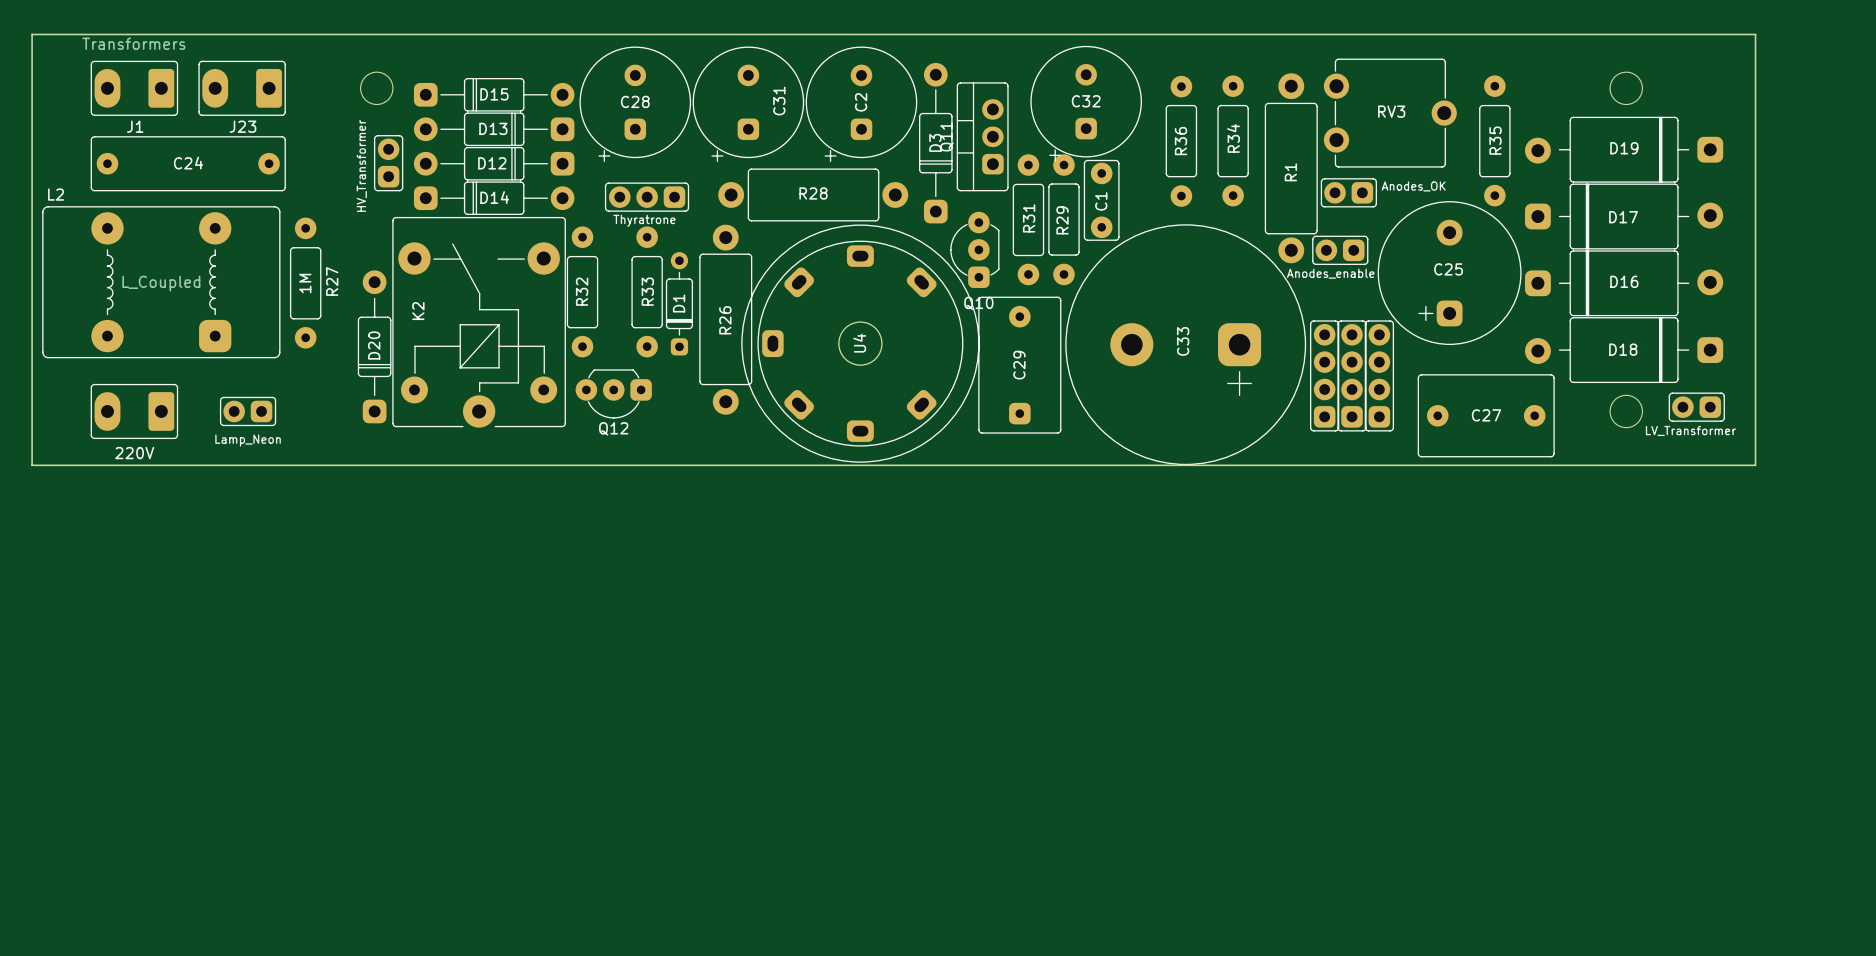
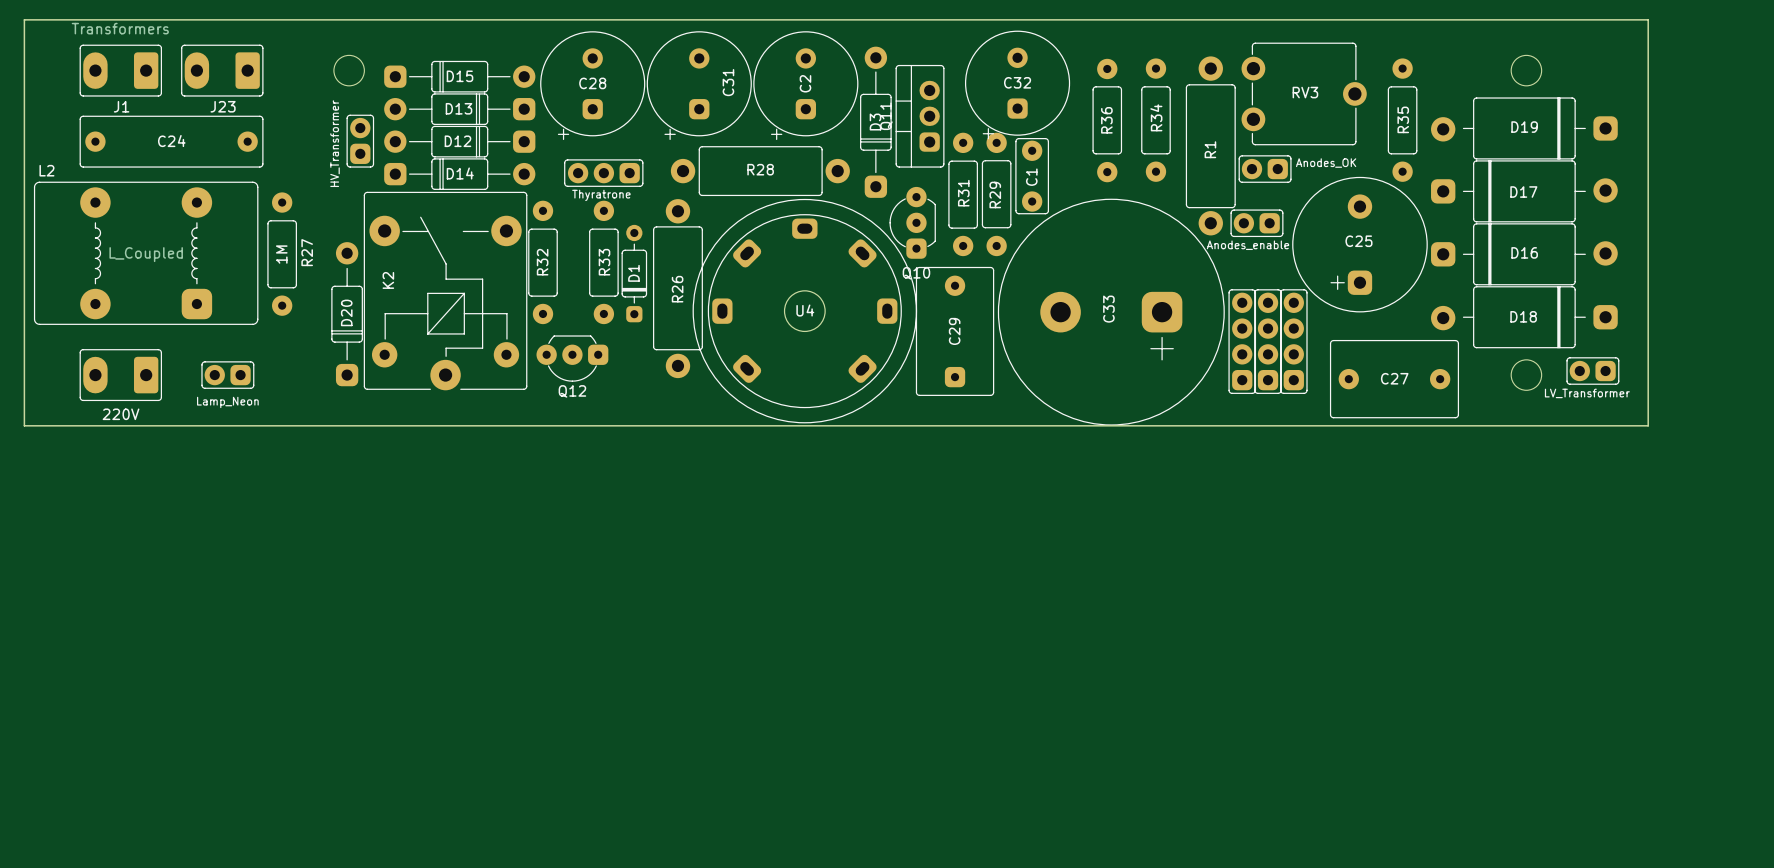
U4 rotation: 0° (860, 343) -> 90° clockwise (804, 311)

